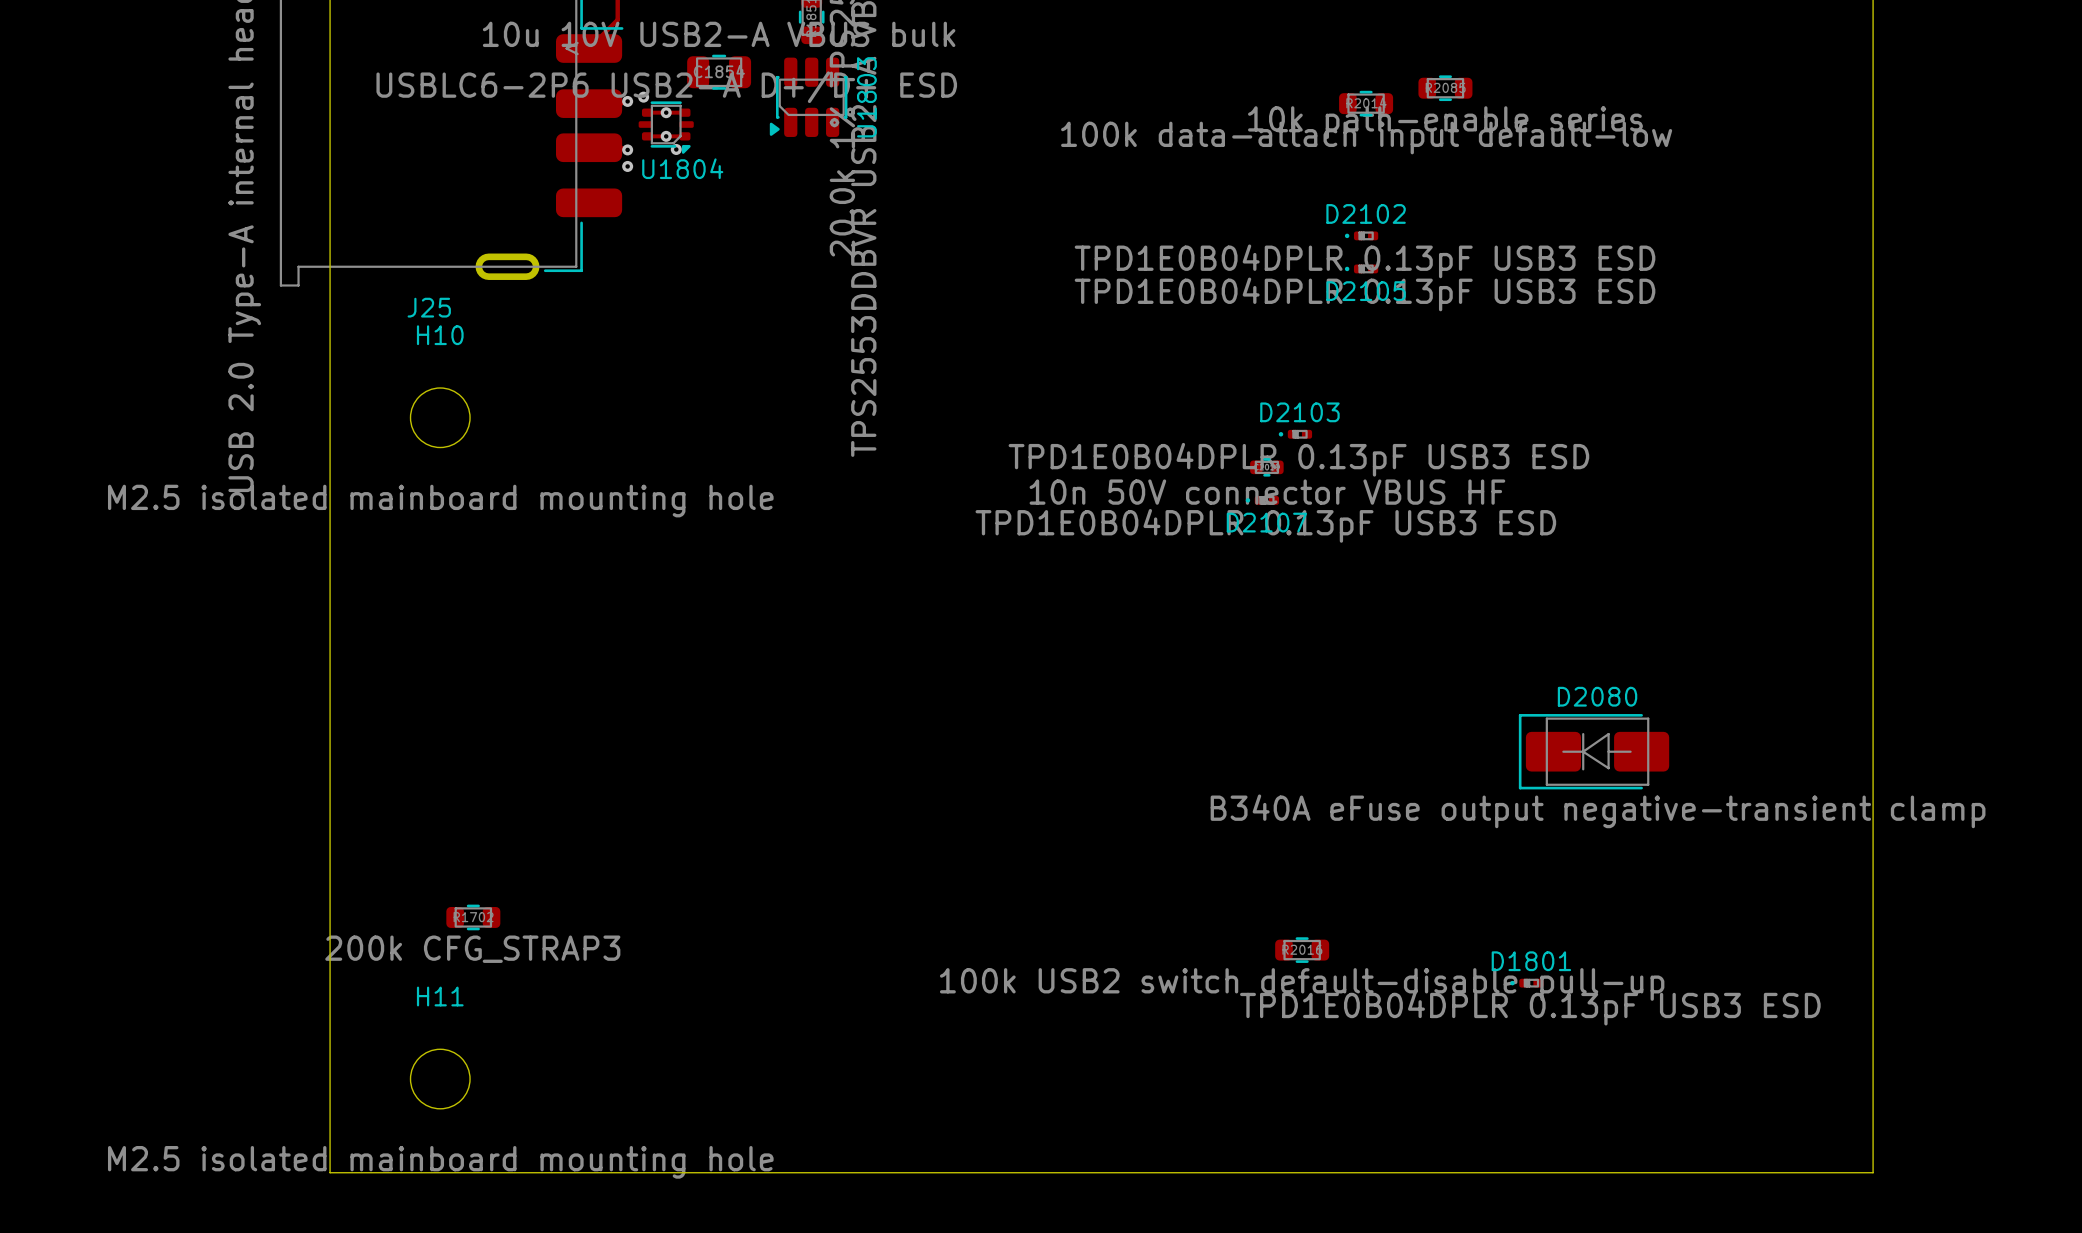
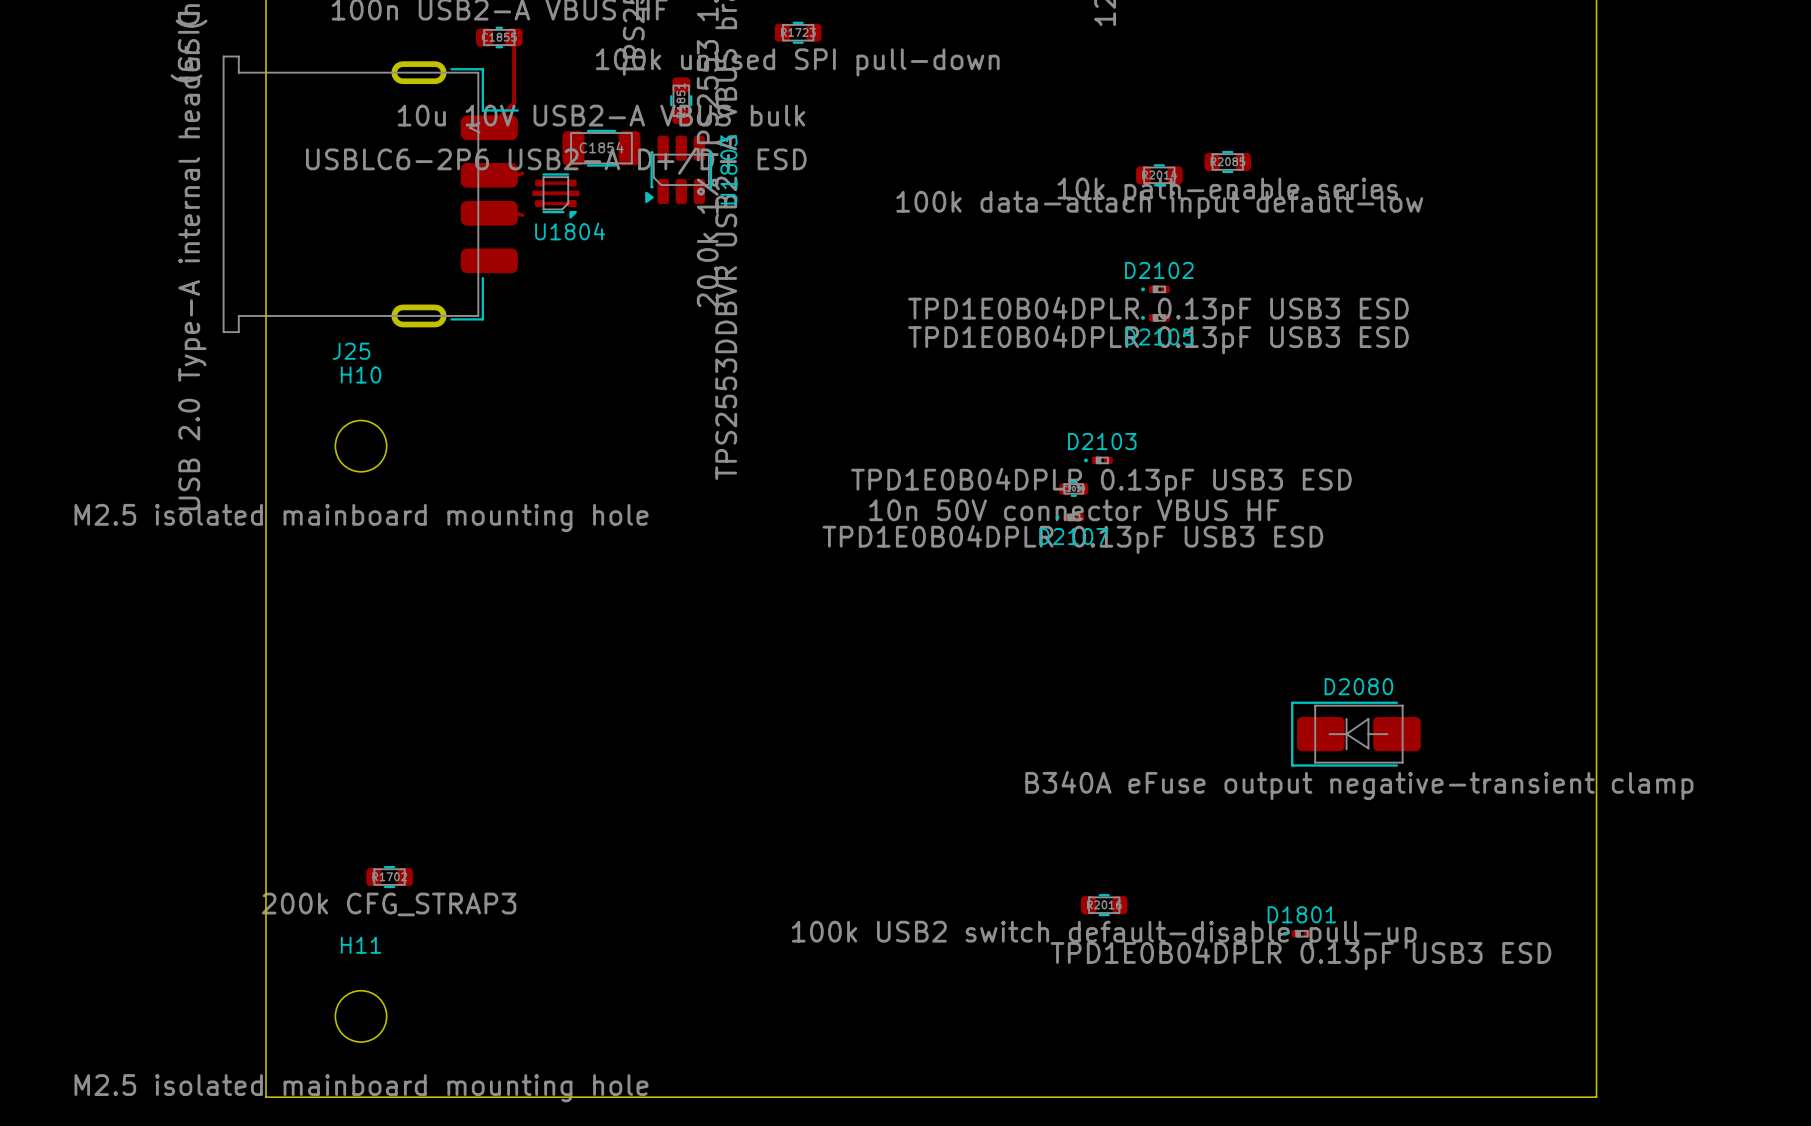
C1854 footprint: [687, 54, 752, 90] -> [562, 129, 641, 167]
via: (643, 97) -> none
via: (627, 101) -> none
via: (666, 112) -> none
top track: none -> (538, 193) (573, 193)
via: (666, 136) -> none
via: (627, 149) -> none
via: (676, 149) -> none
via: (627, 166) -> none

